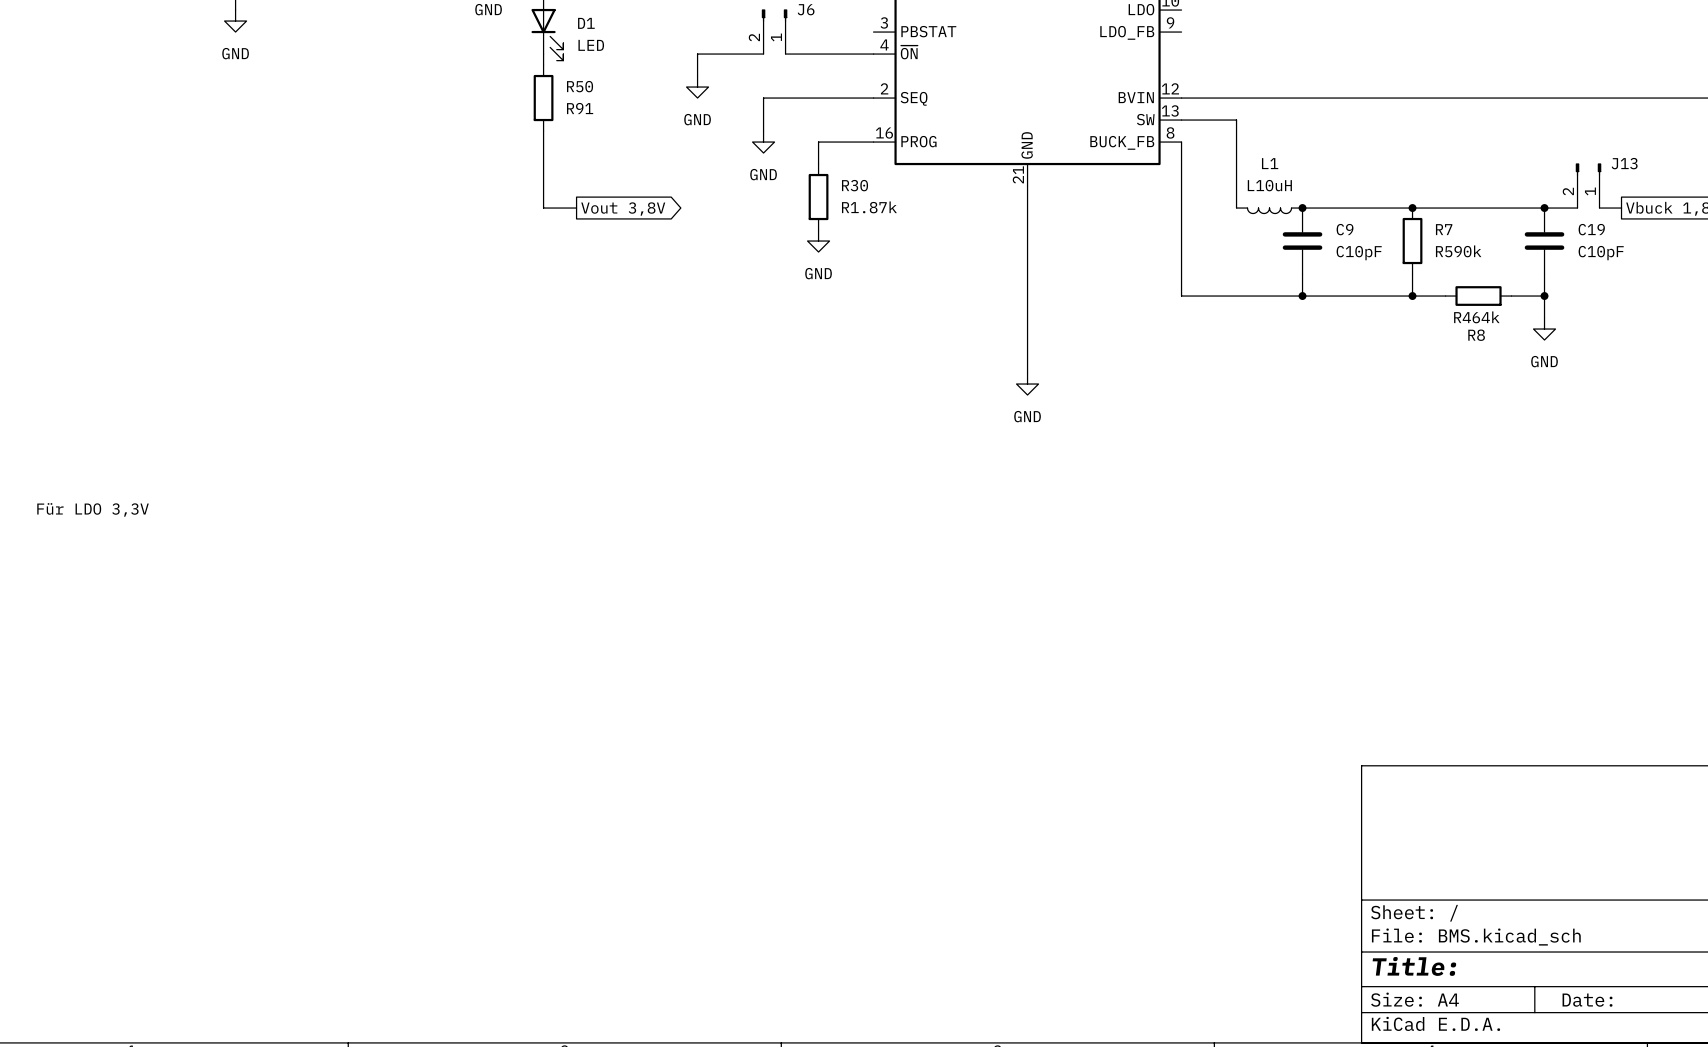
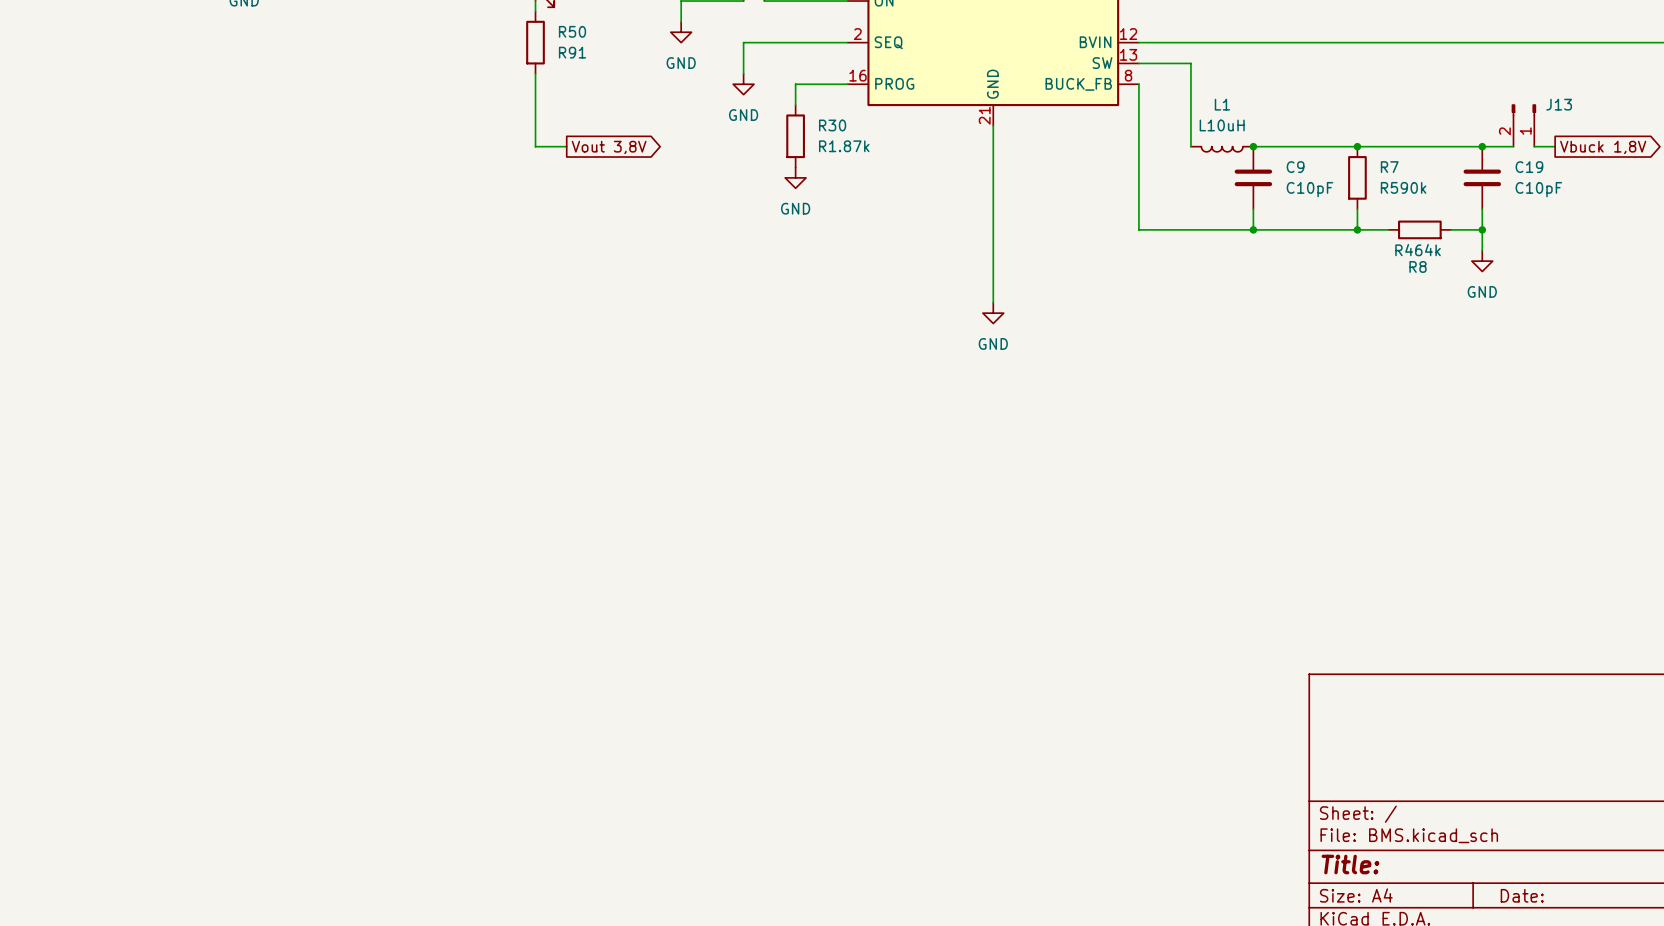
text: Für LDO 3,3V (93, 509) -> none

